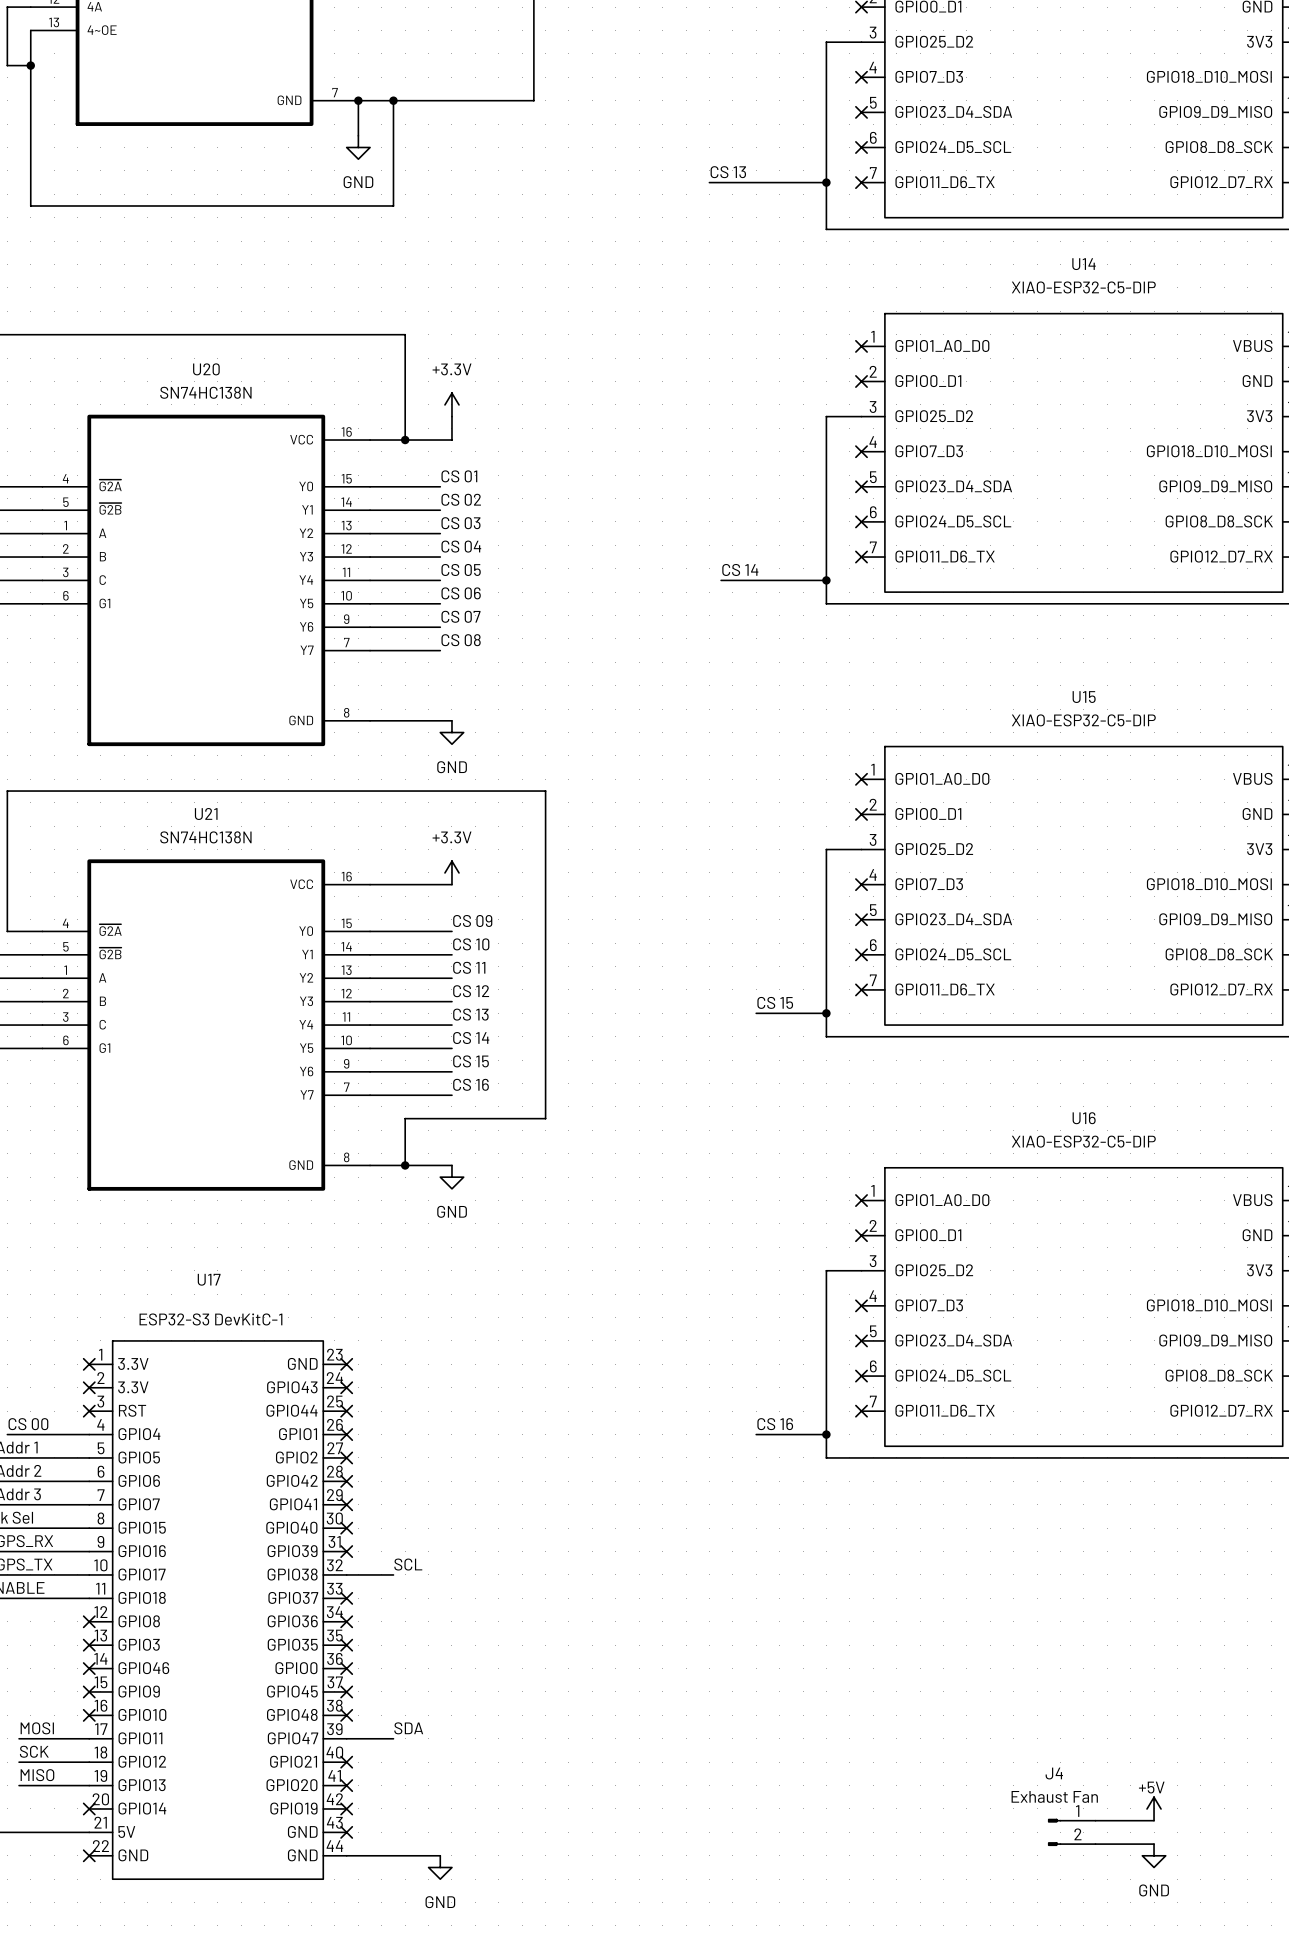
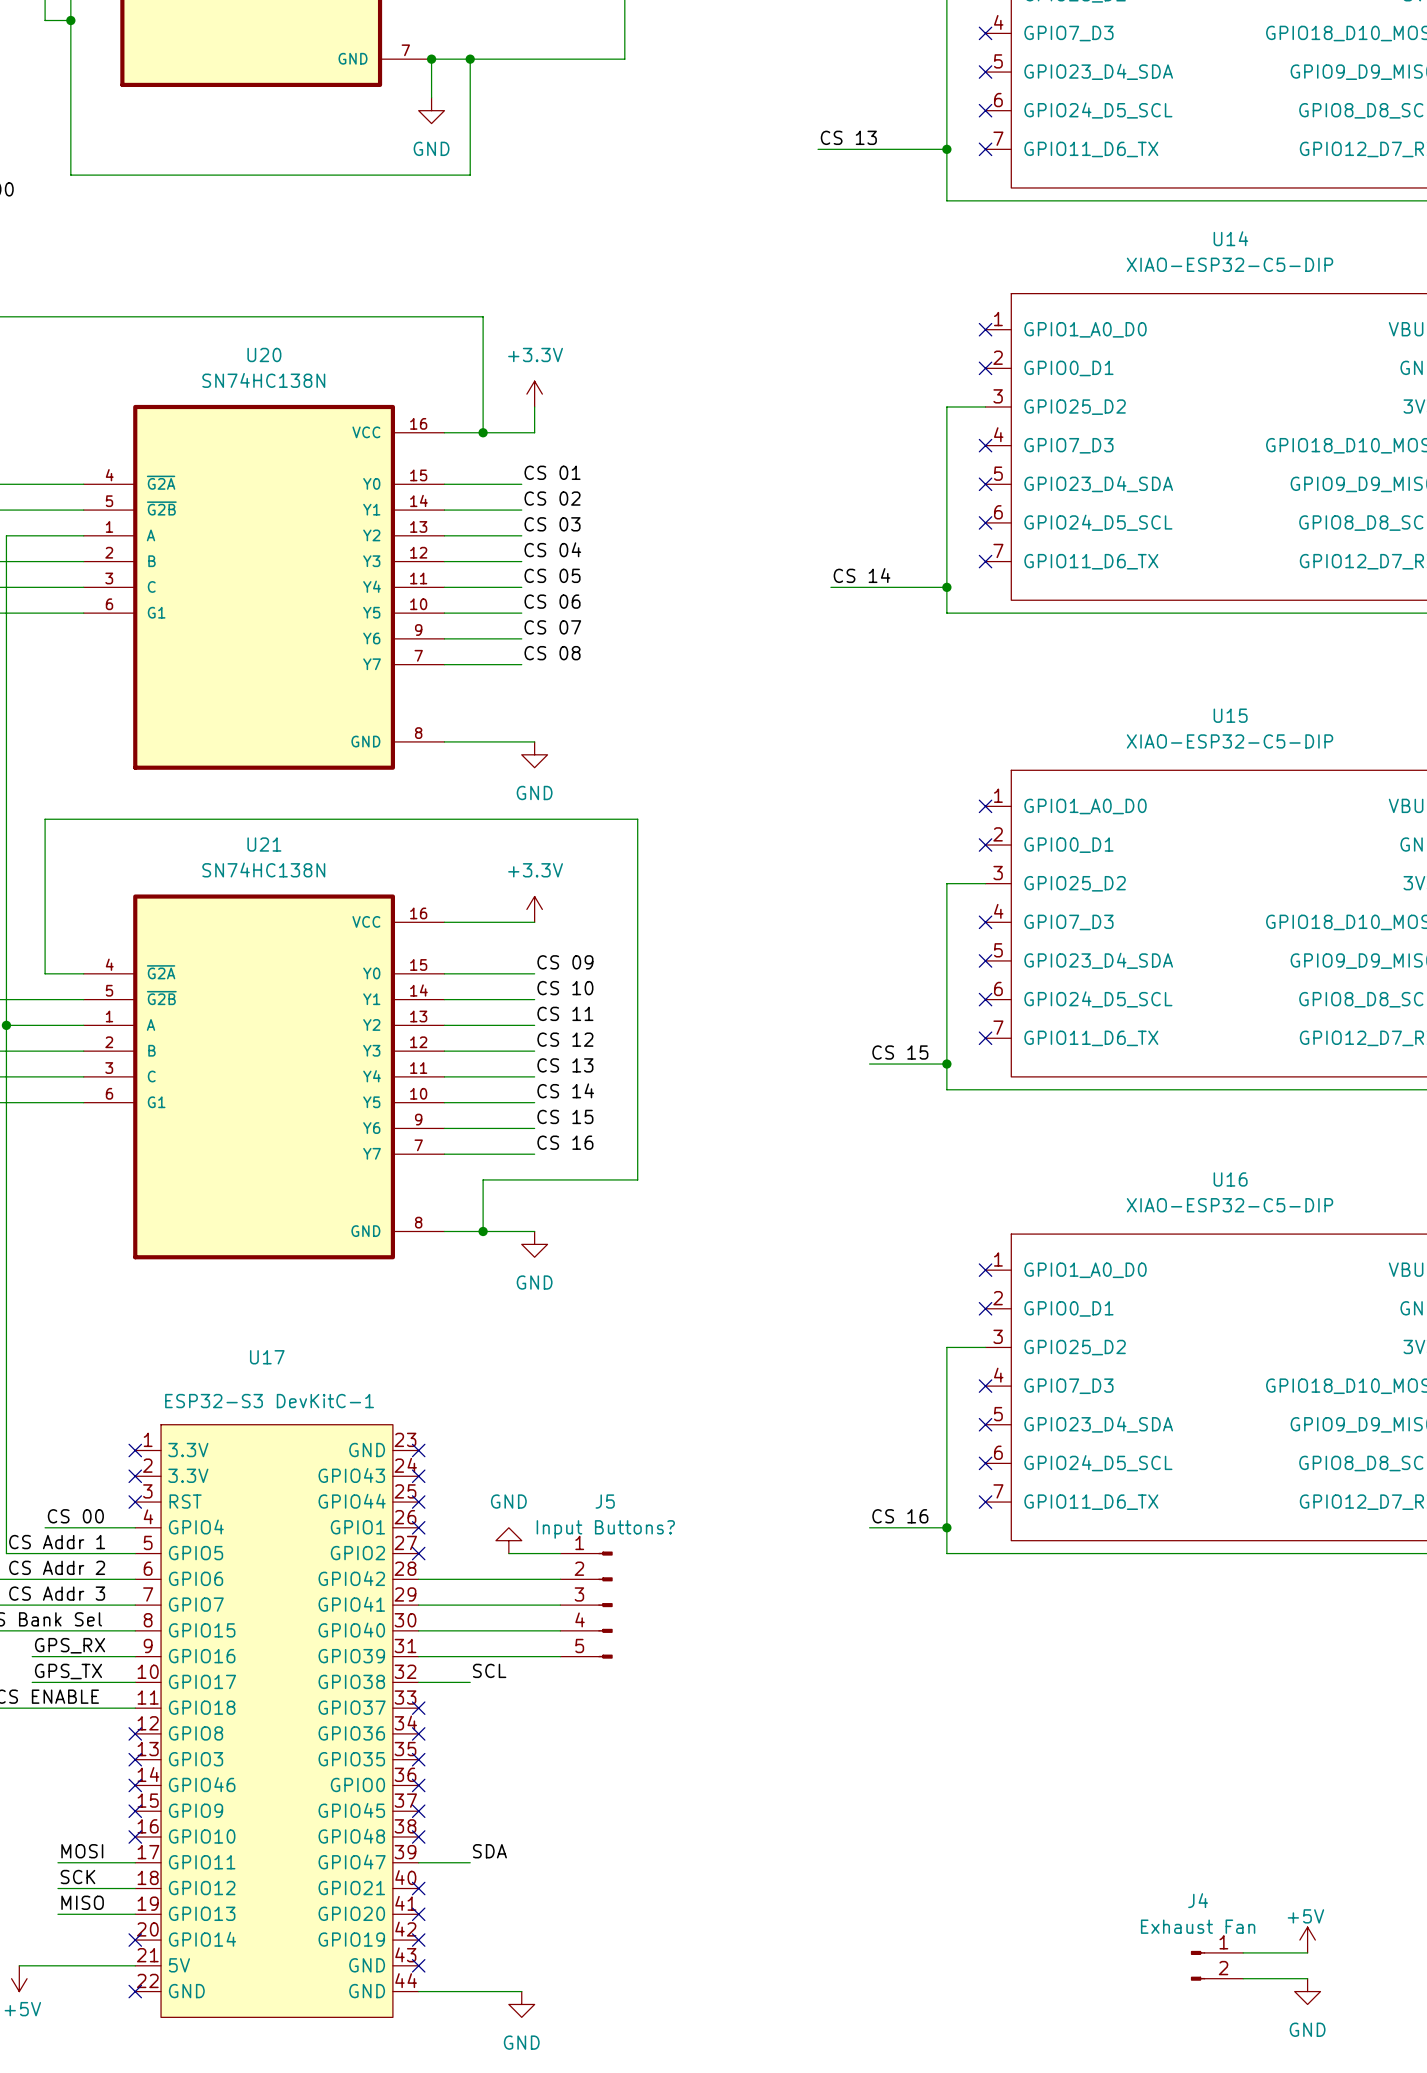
power symbol: none -> GND (508, 1540)
wire: none -> (508, 1553) (560, 1553)
wire: none -> (418, 1579) (560, 1579)
no-connect mark: (346, 1481) -> none
wire: none -> (418, 1605) (560, 1605)
no-connect mark: (346, 1504) -> none
J5: none -> Input Buttons? (586, 1605)
wire: none -> (418, 1630) (560, 1630)
no-connect mark: (346, 1528) -> none
wire: none -> (418, 1656) (560, 1656)
no-connect mark: (346, 1551) -> none

